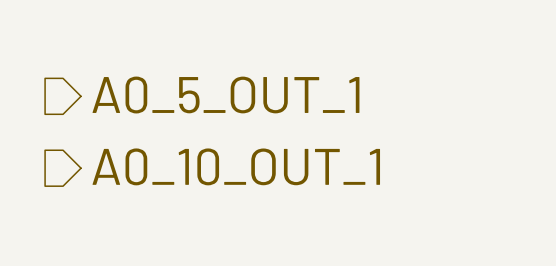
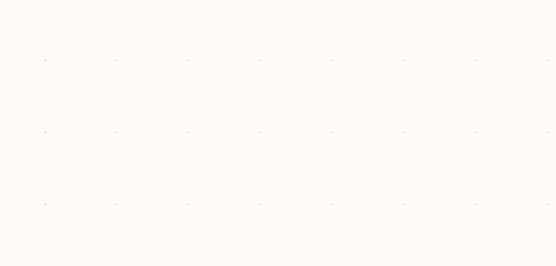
hierarchical label: A0_5_OUT_1 (225, 95) -> none
hierarchical label: A0_10_OUT_1 (236, 166) -> none

